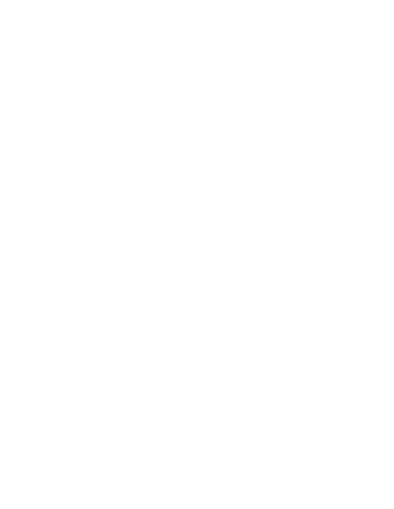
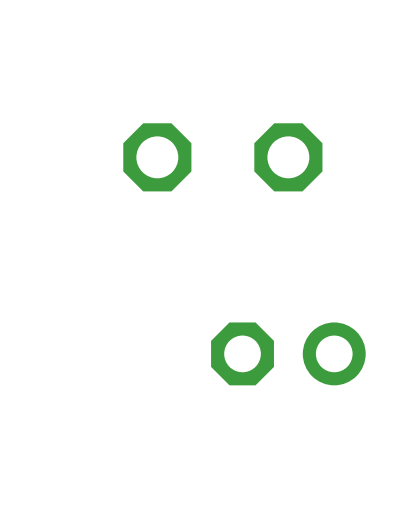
part: none -> (222, 157)
part: none -> (288, 353)

